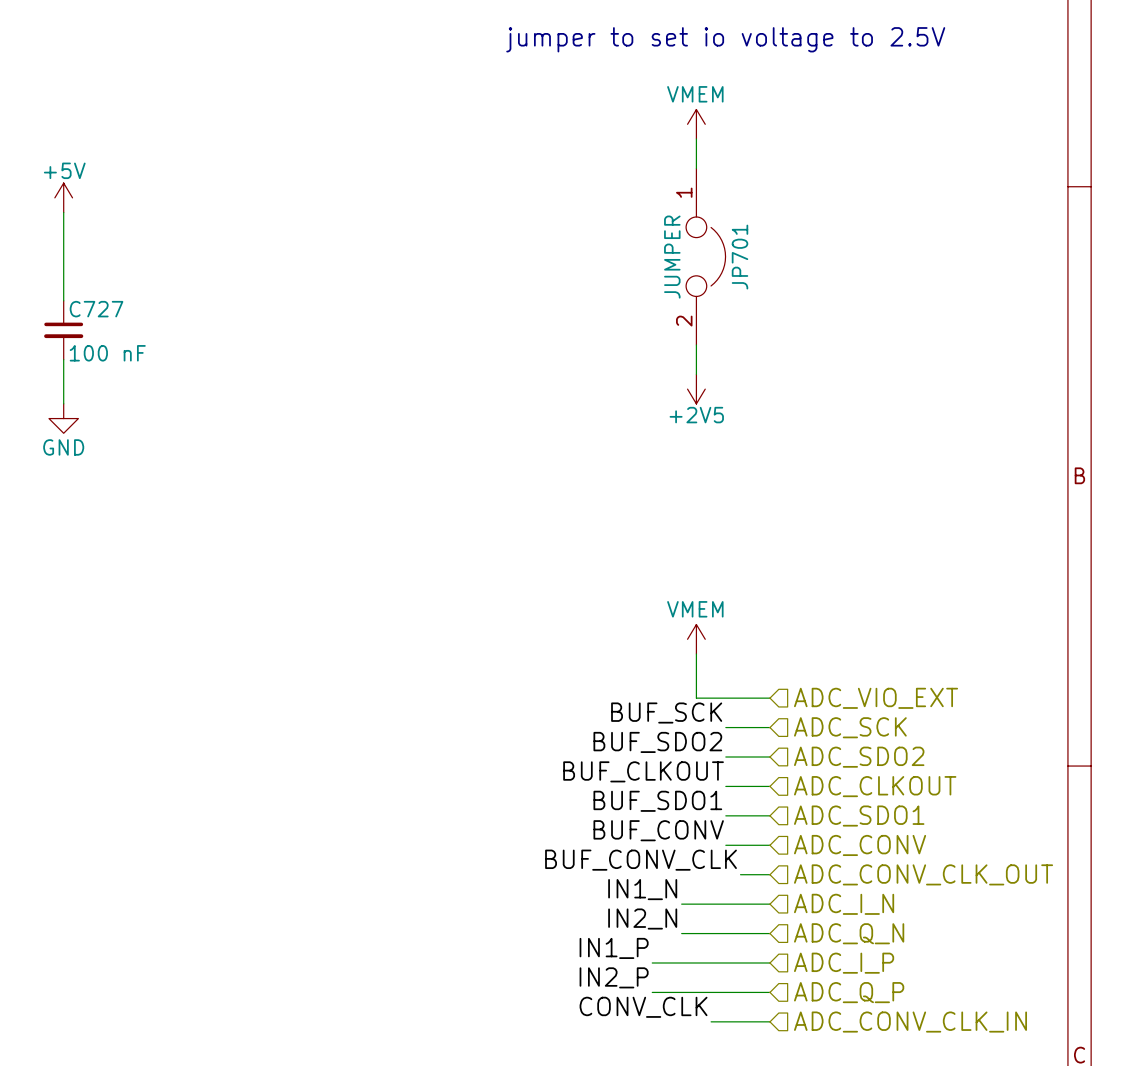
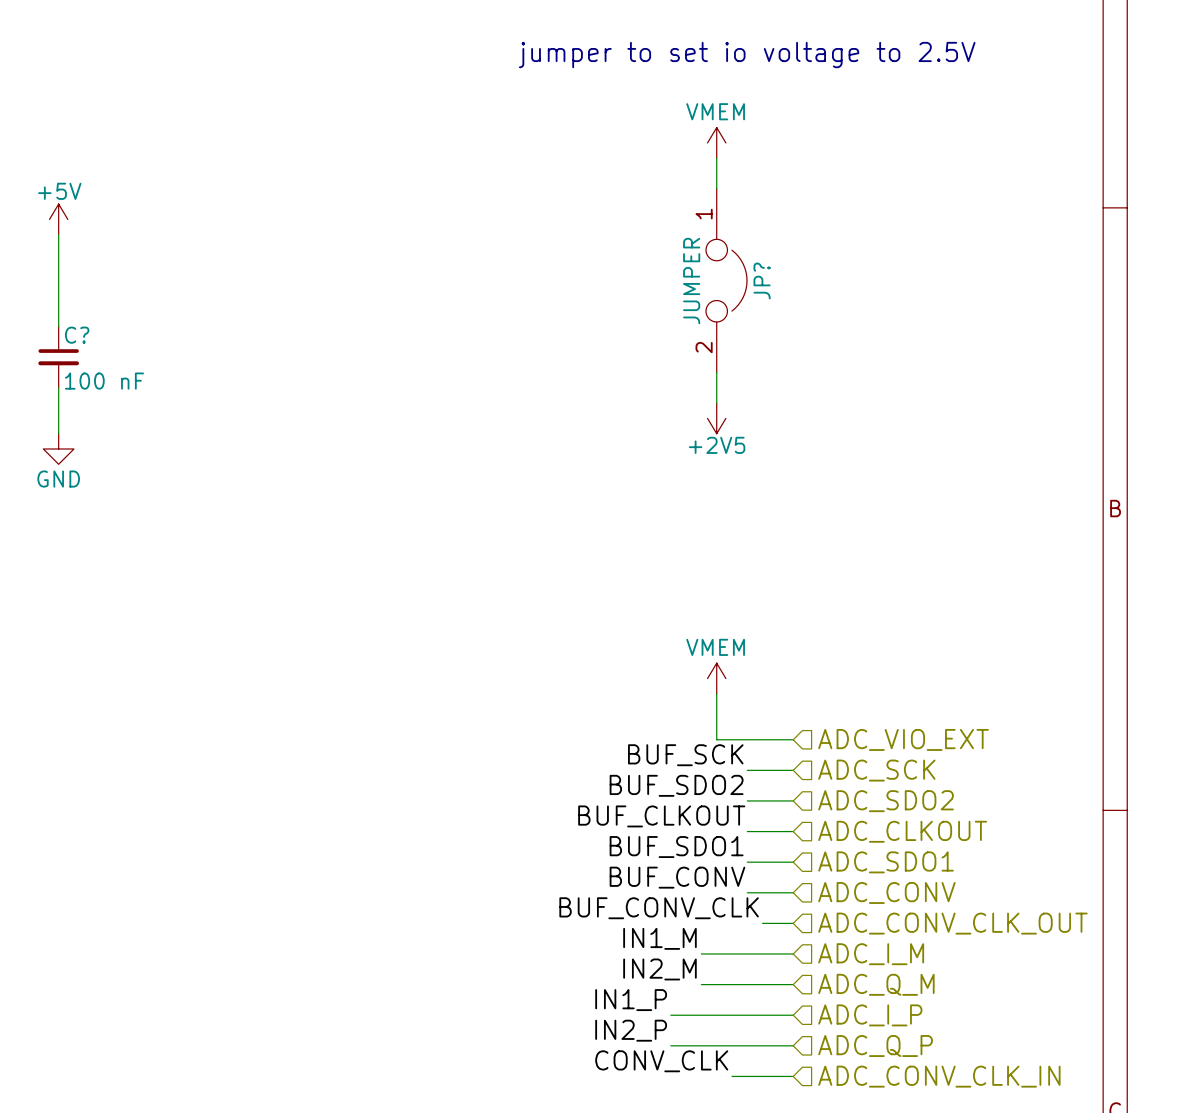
JP701 name: JP701 (740, 257) -> JP? (762, 281)
C727 name: C727 (96, 309) -> C? (77, 335)
label: IN1_N (642, 889) -> IN1_M (659, 938)
hierarchical label: ADC_I_N (844, 904) -> ADC_I_M (871, 954)
label: IN2_N (642, 919) -> IN2_M (659, 969)
hierarchical label: ADC_Q_N (849, 933) -> ADC_Q_M (876, 984)

